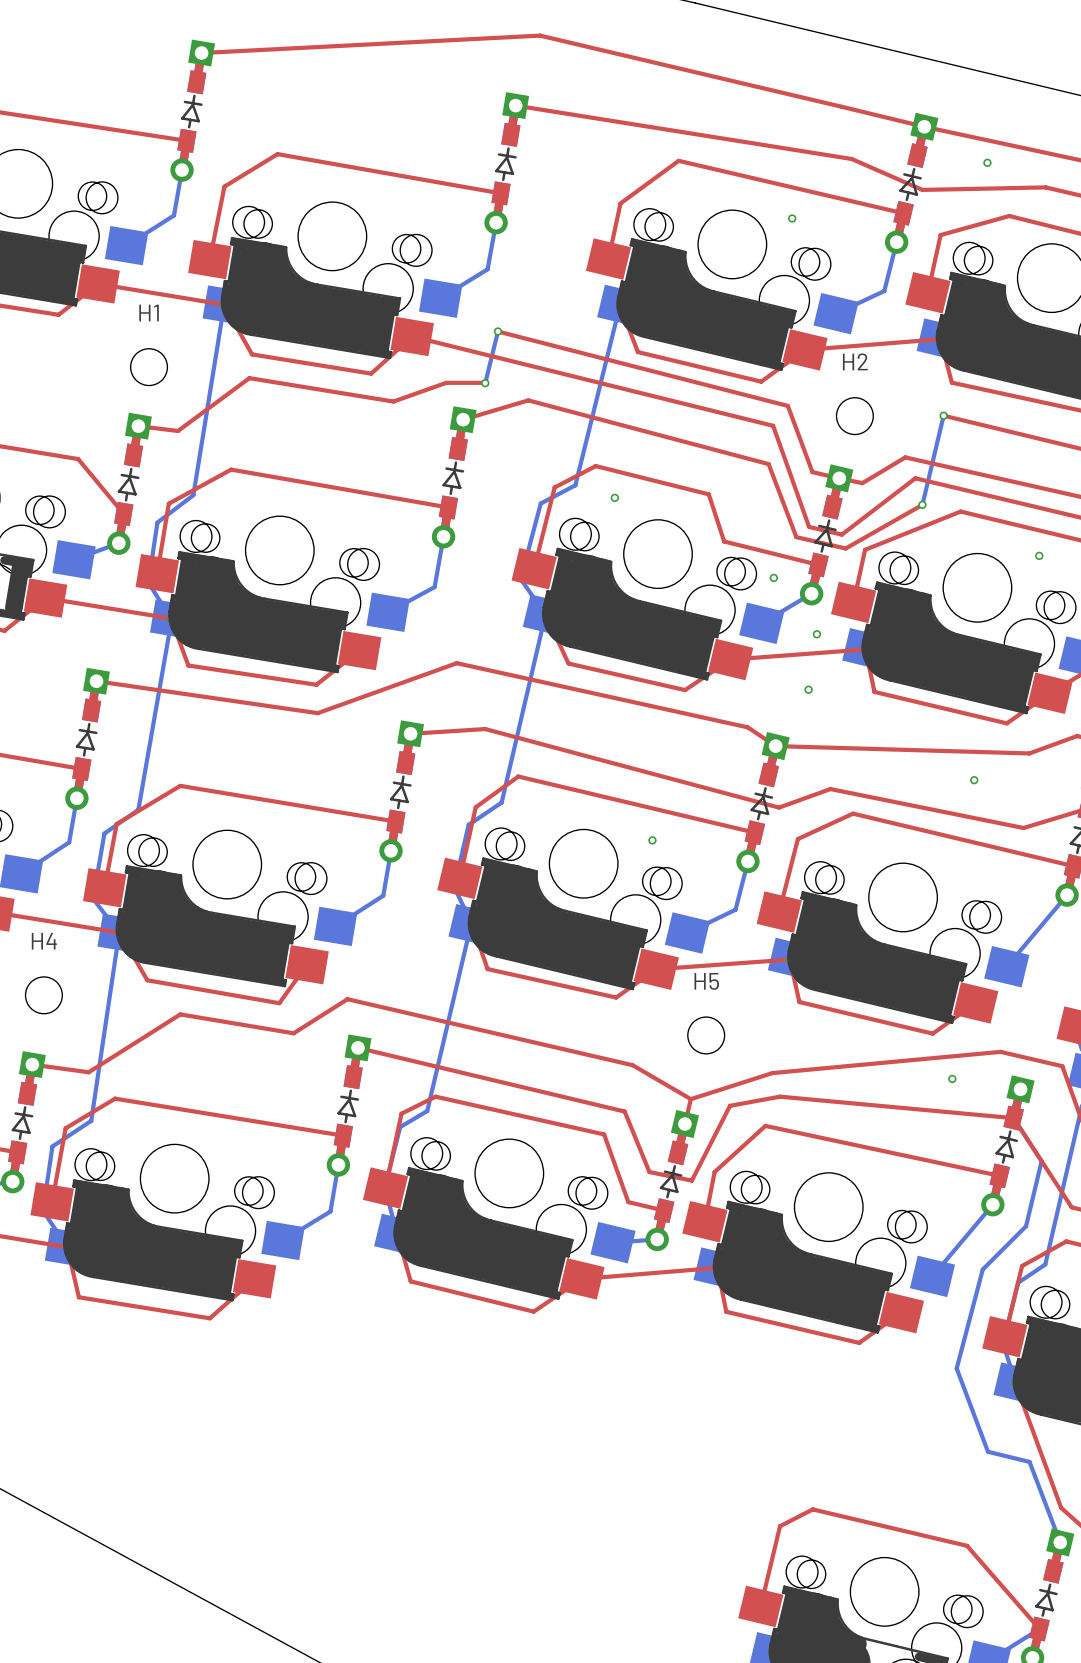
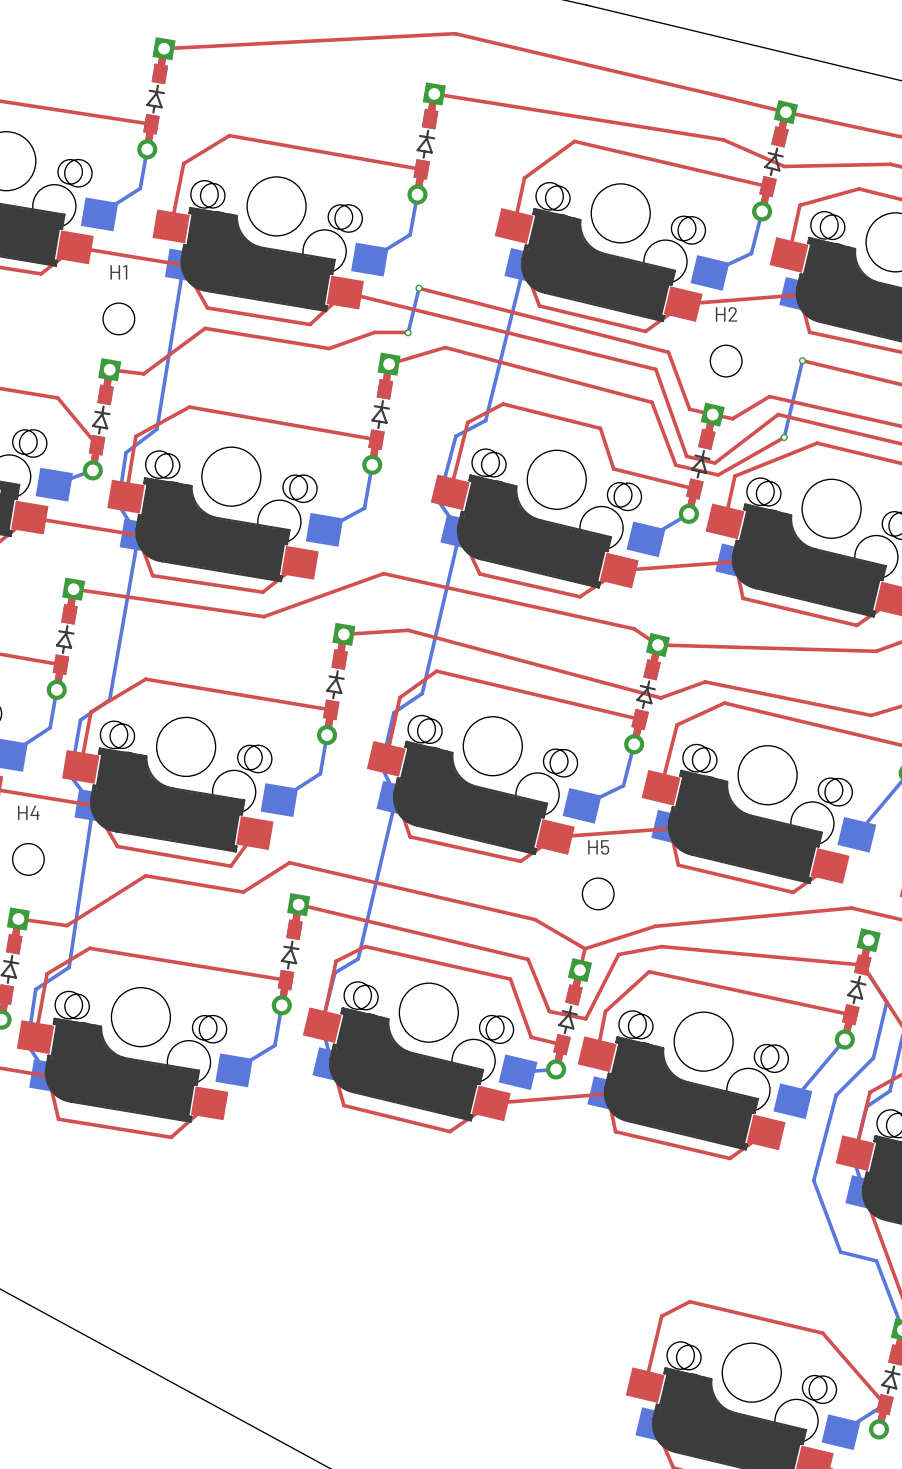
via: (987, 162) -> none
via: (792, 218) -> none
via: (614, 497) -> none
via: (1039, 555) -> none
via: (773, 577) -> none
via: (816, 634) -> none
via: (808, 689) -> none
via: (974, 780) -> none
via: (652, 840) -> none
via: (952, 1078) -> none

